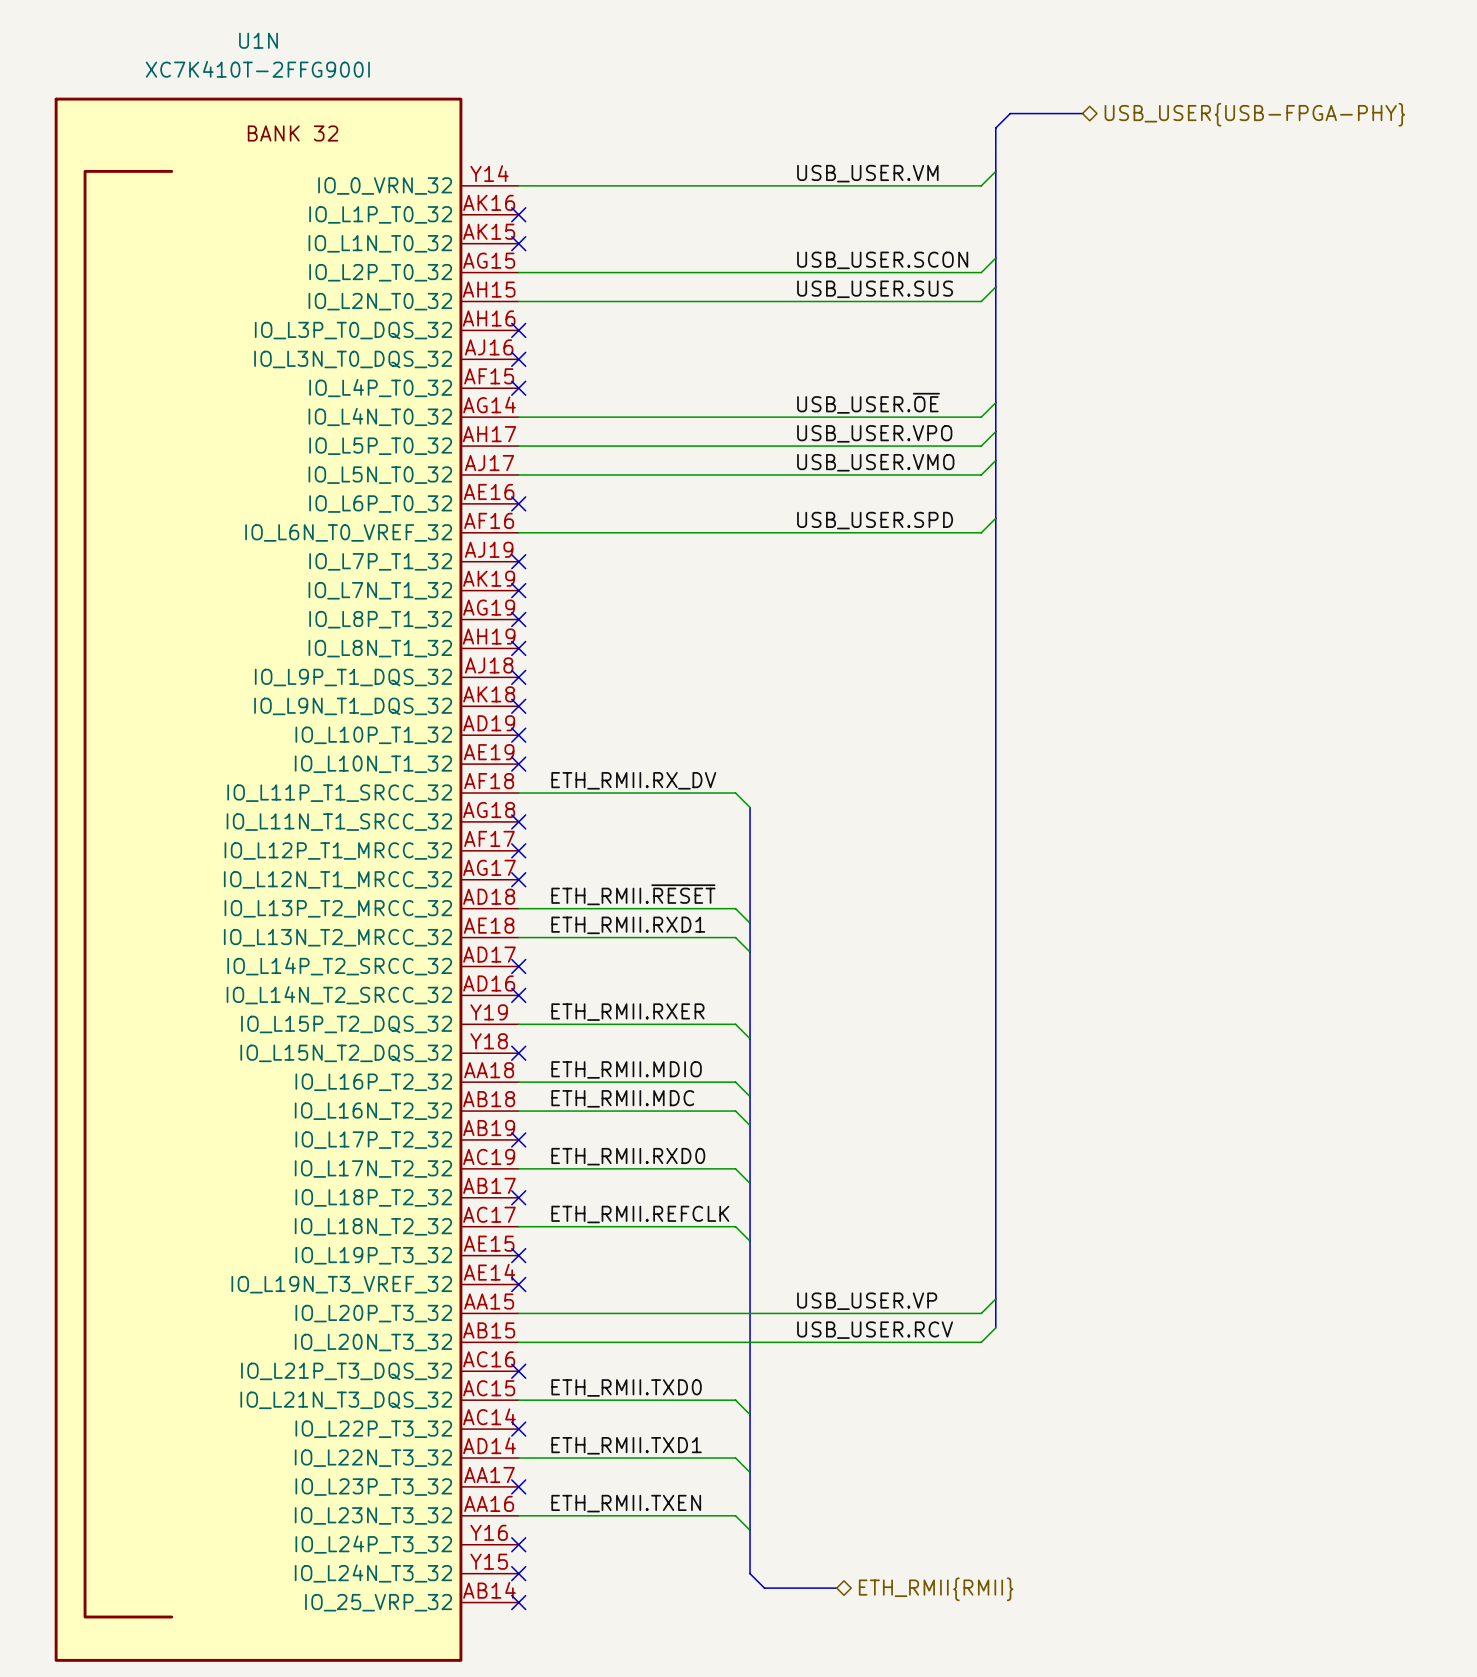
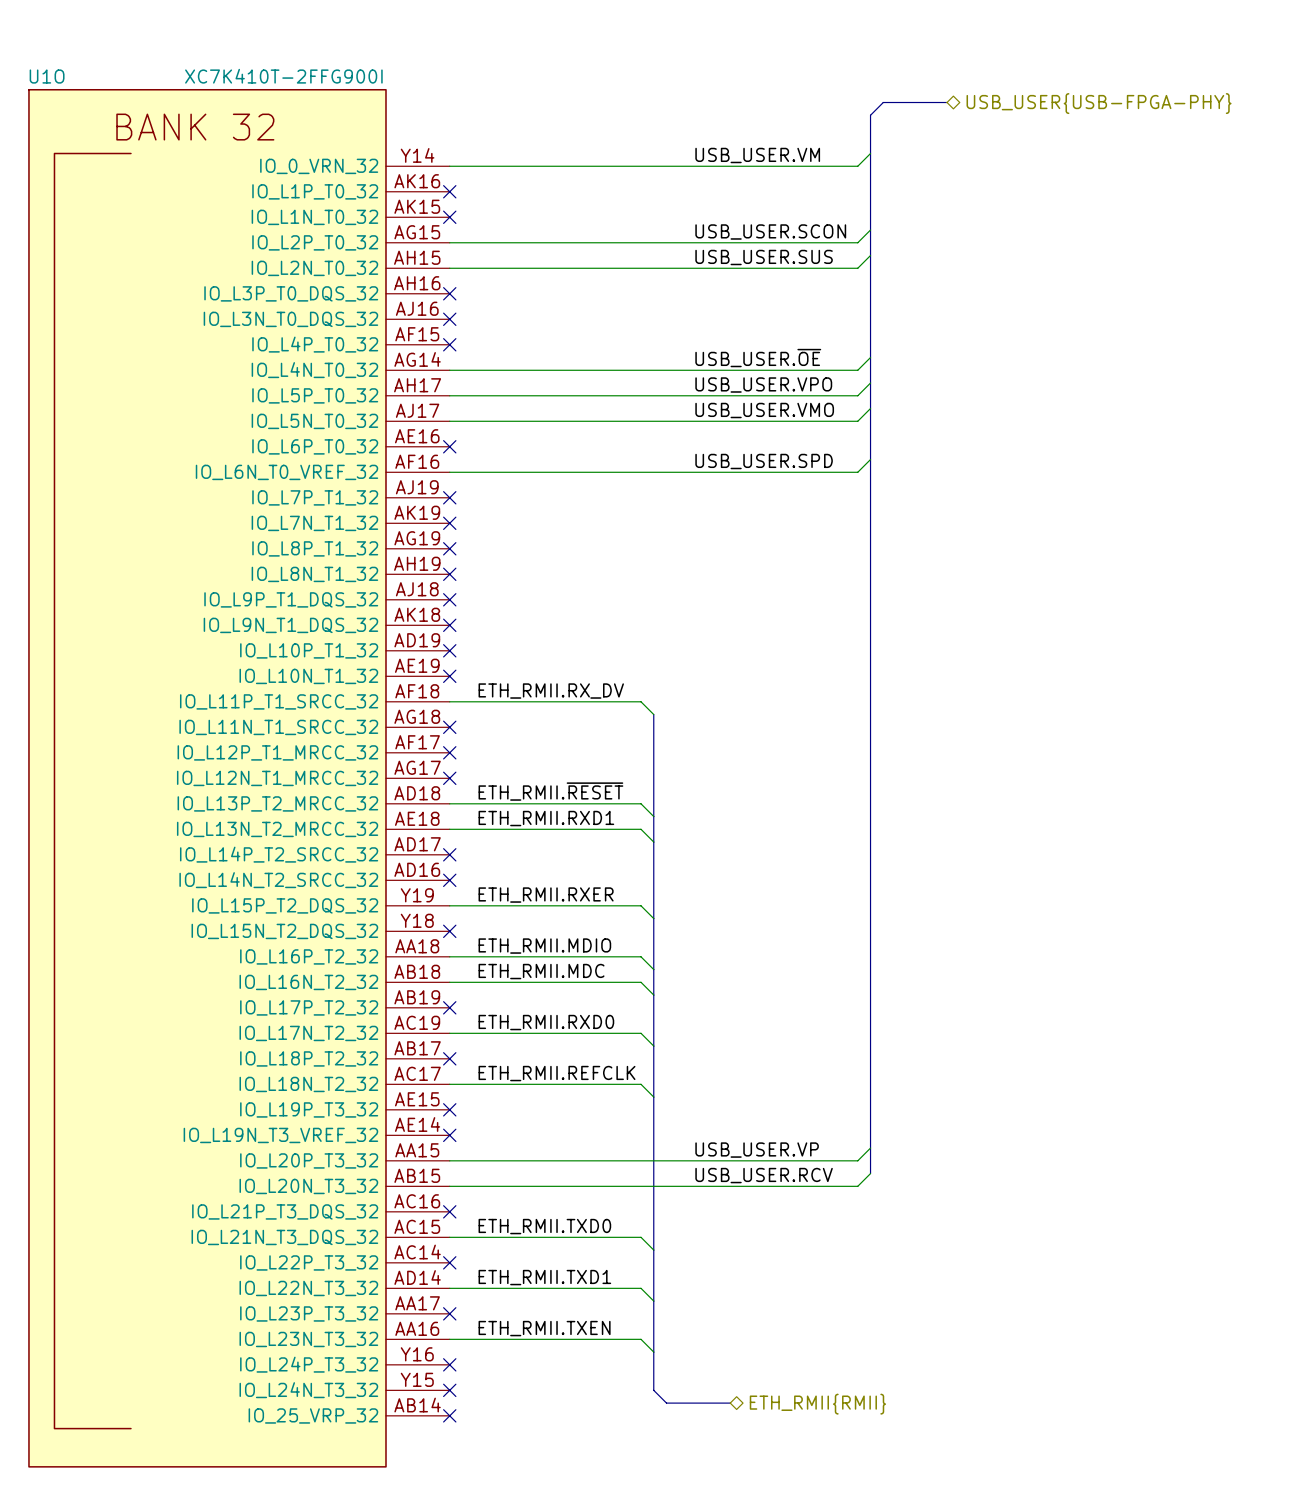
U1O: none -> XC7K410T-2FFG900I (238, 778)
U1N: XC7K410T-2FFG900I (286, 879) -> none

